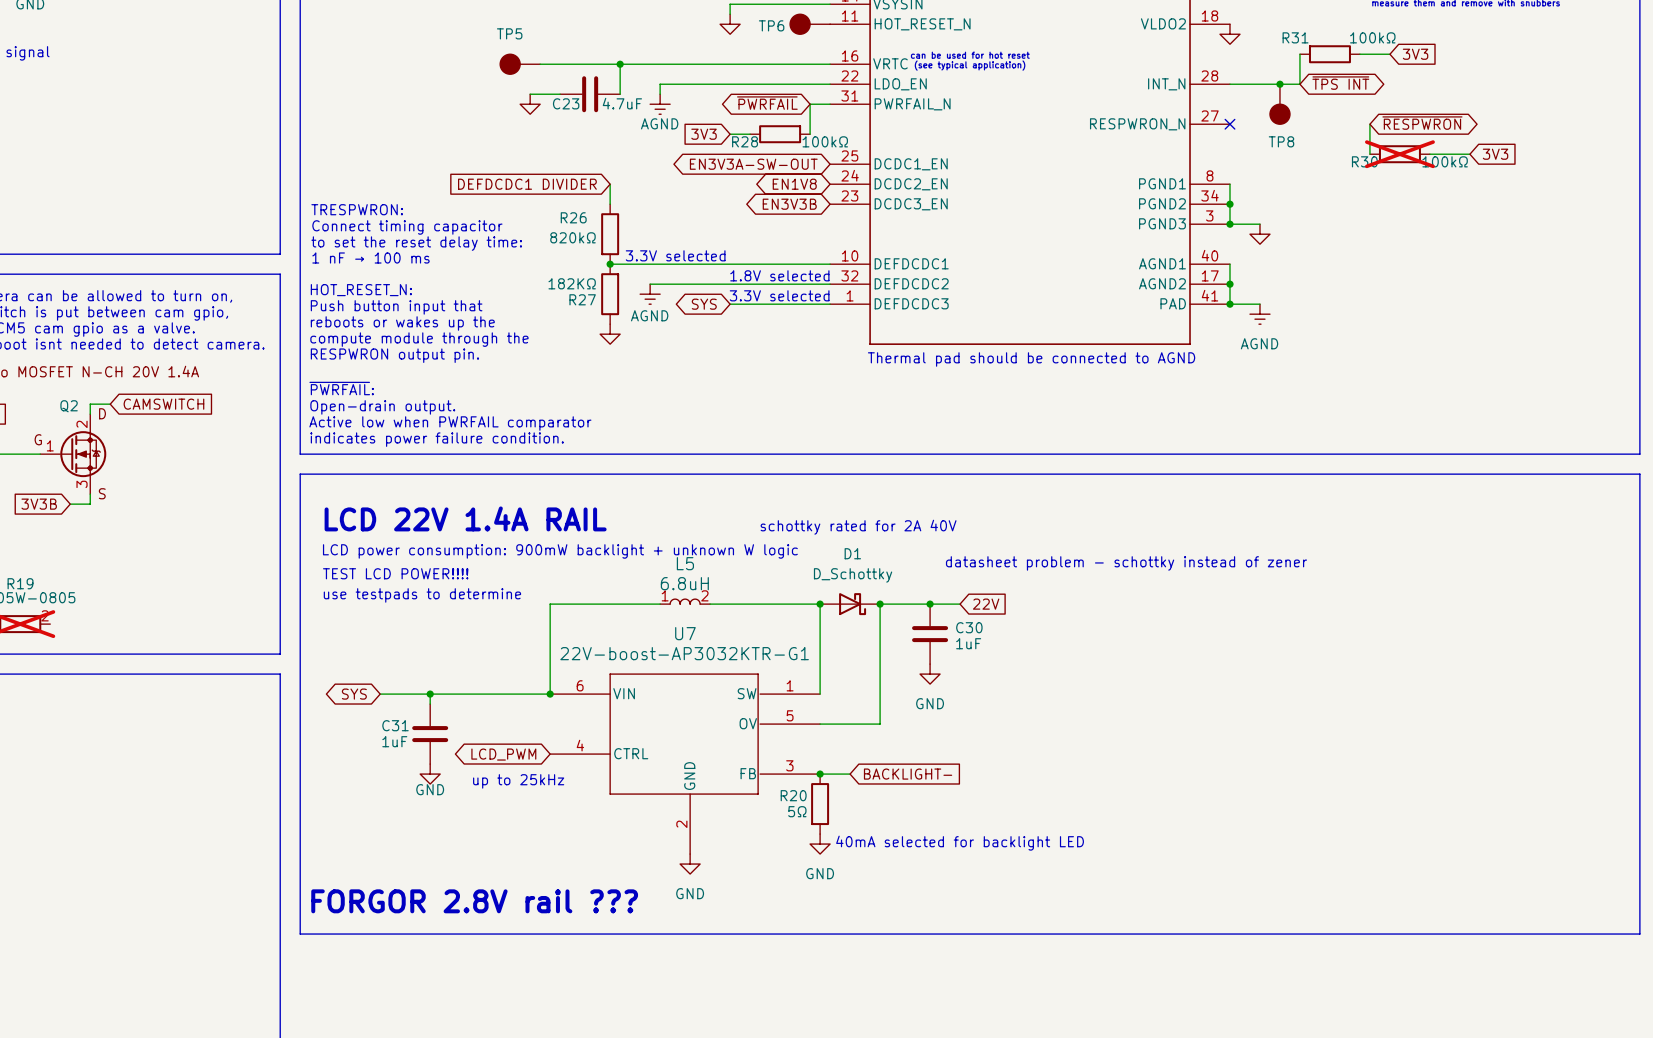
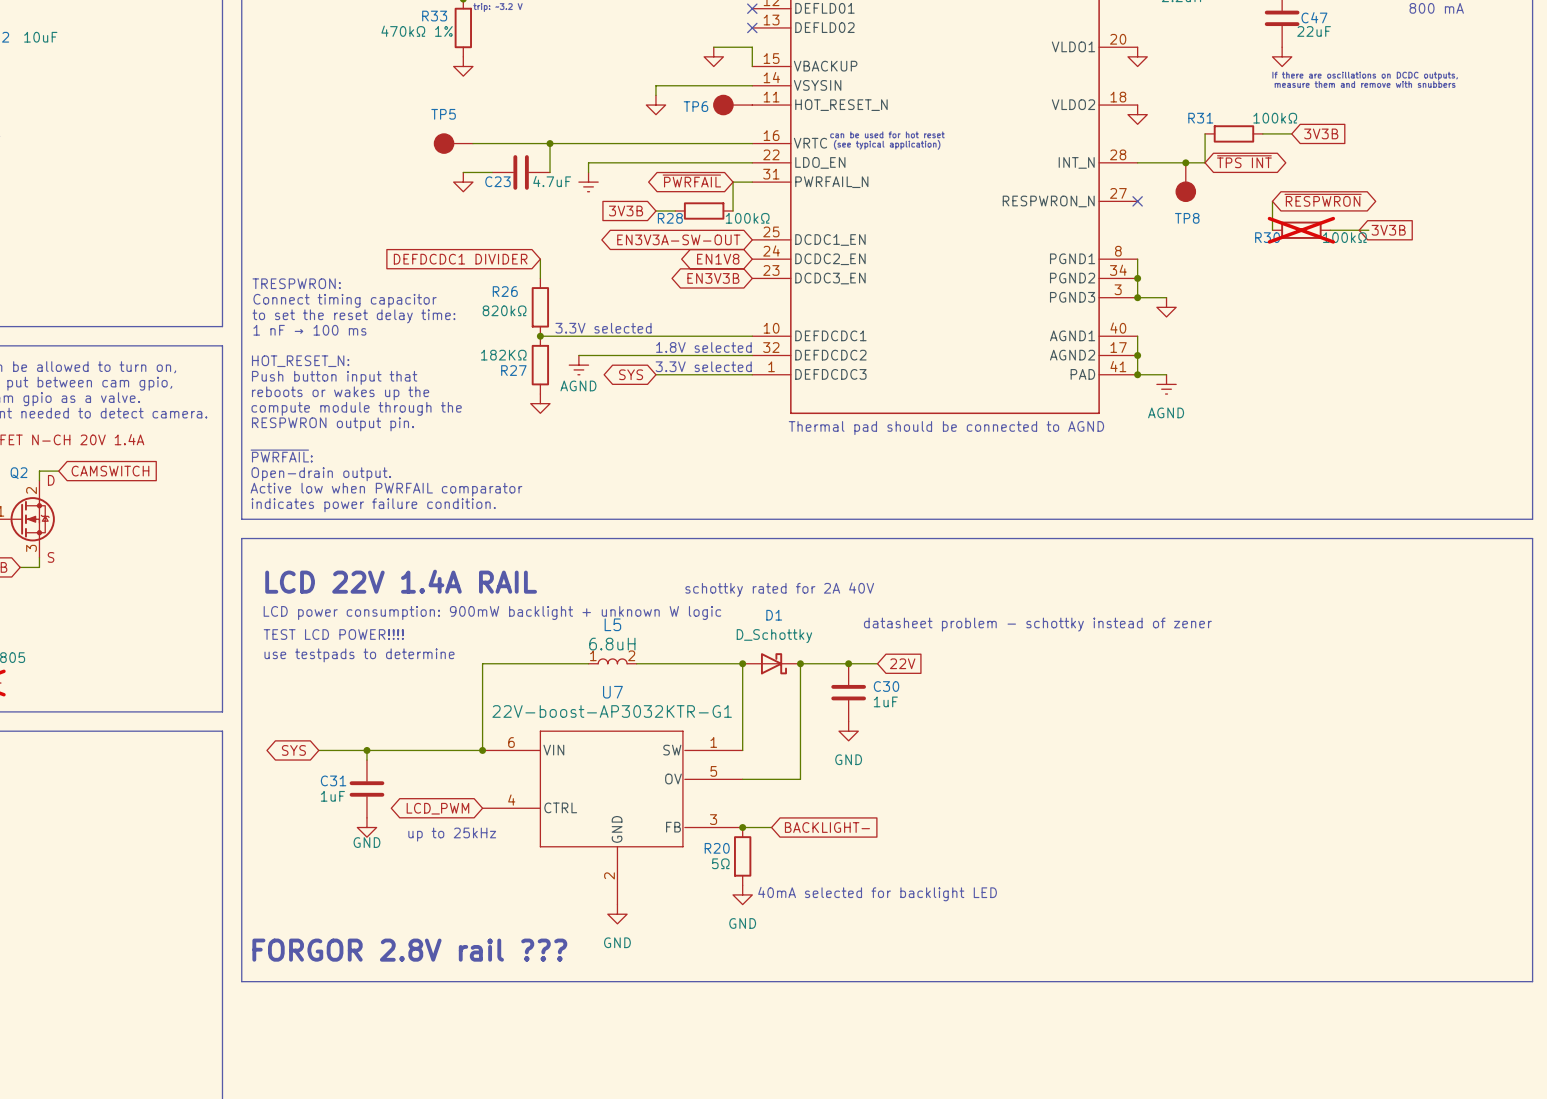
global label: 3V3 (1415, 54) -> 3V3B (1321, 133)
power symbol text: AGND (659, 123) -> none
global label: 3V3 (704, 134) -> 3V3B (626, 211)
global label: 3V3 (1495, 154) -> 3V3B (1388, 230)

